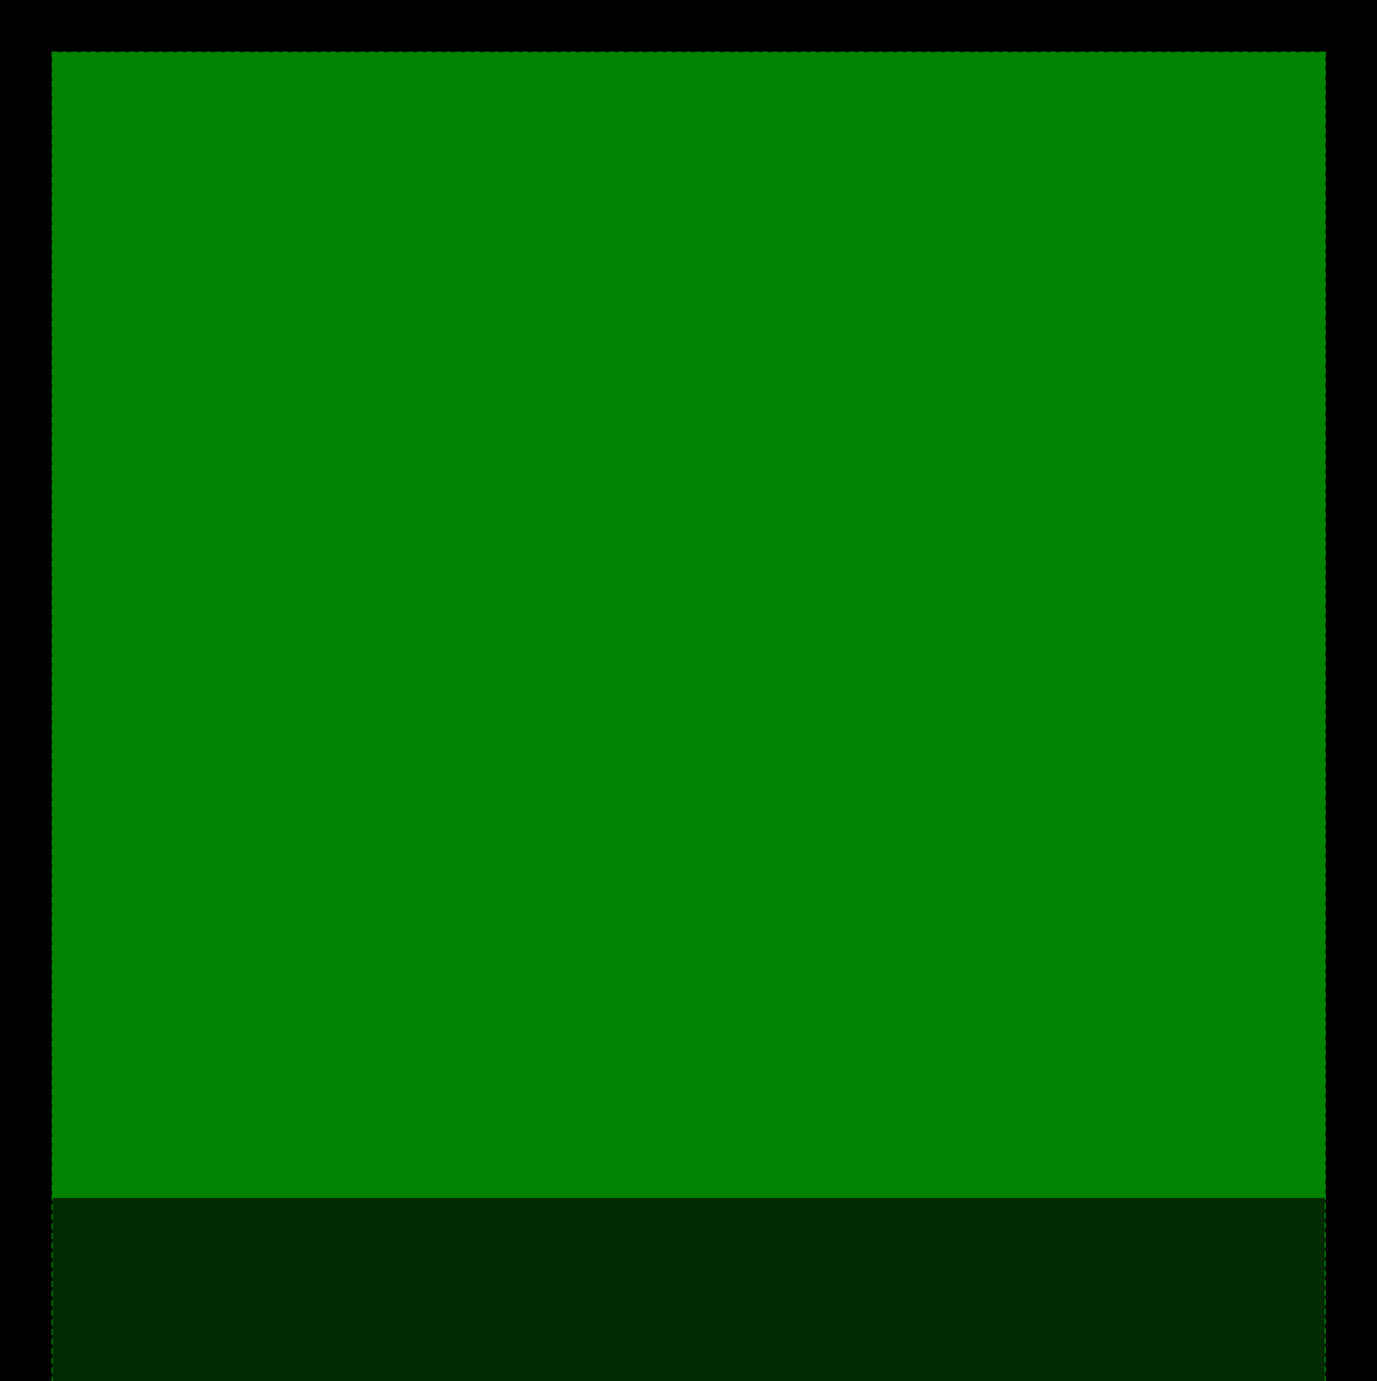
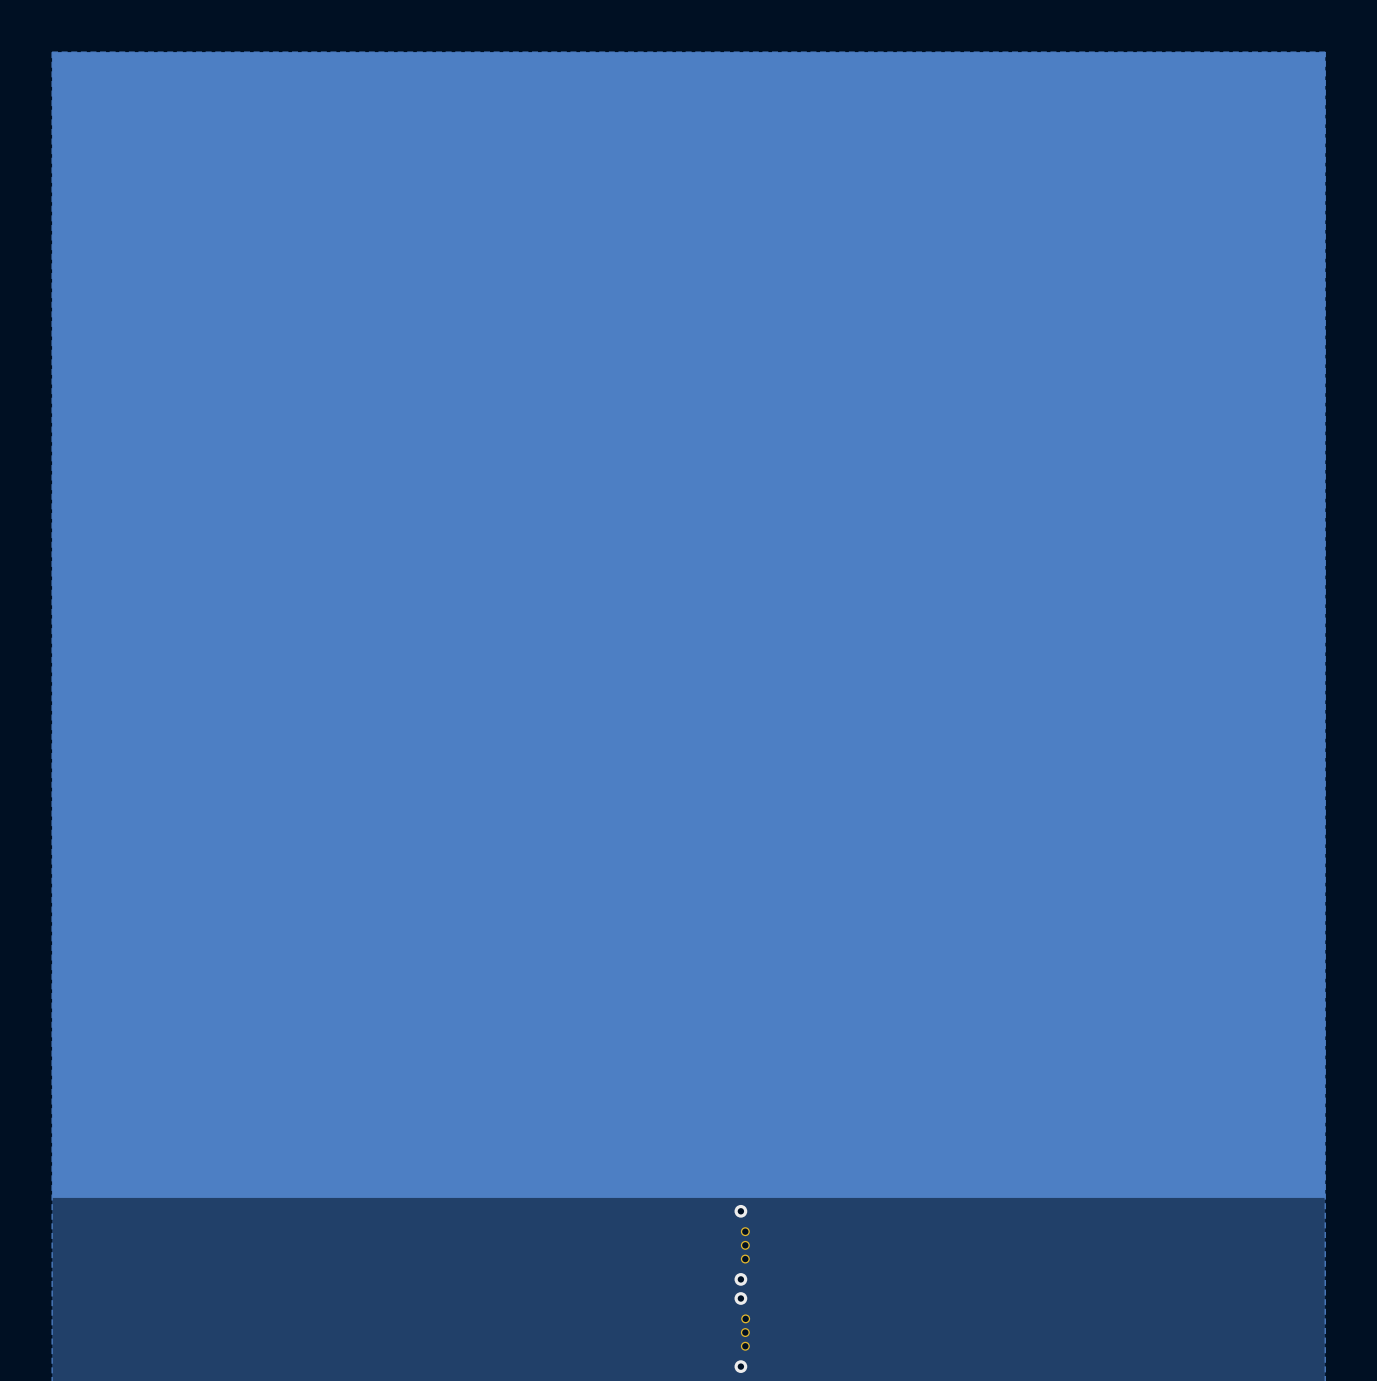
via: none -> (740, 1211)
part: none -> (745, 1231)
part: none -> (745, 1245)
part: none -> (745, 1259)
via: none -> (740, 1279)
via: none -> (740, 1298)
part: none -> (745, 1318)
part: none -> (745, 1332)
part: none -> (745, 1346)
via: none -> (740, 1366)

